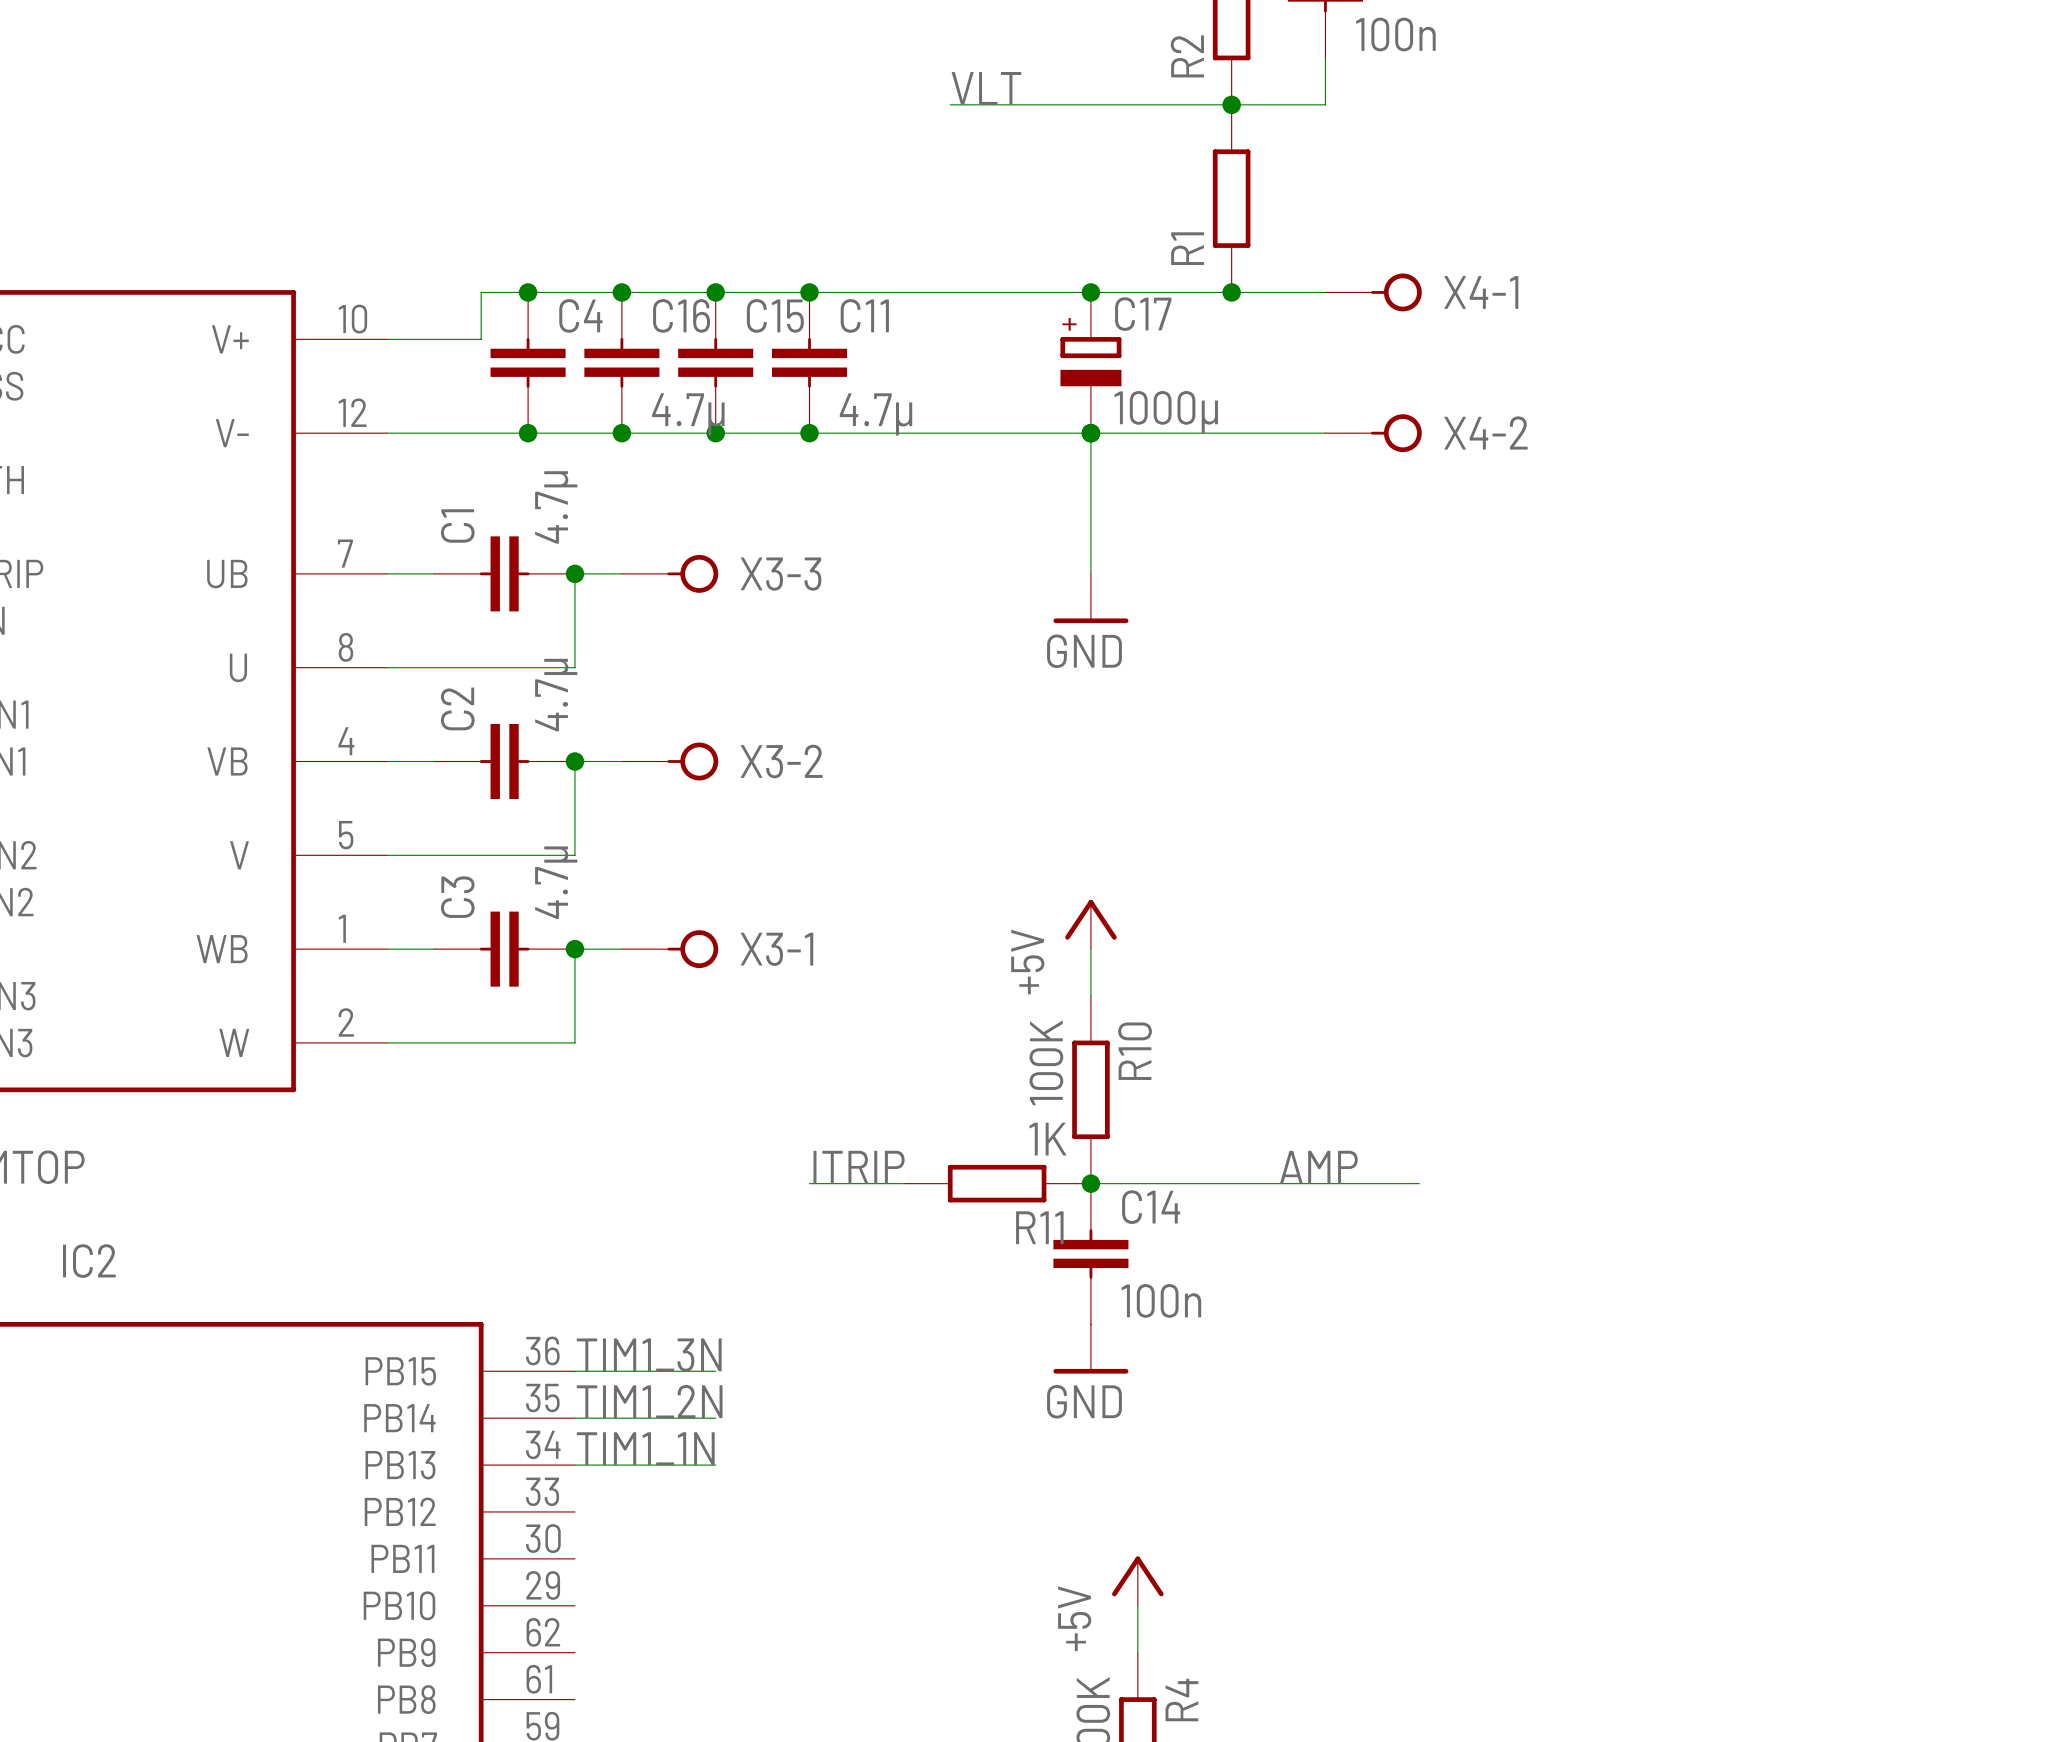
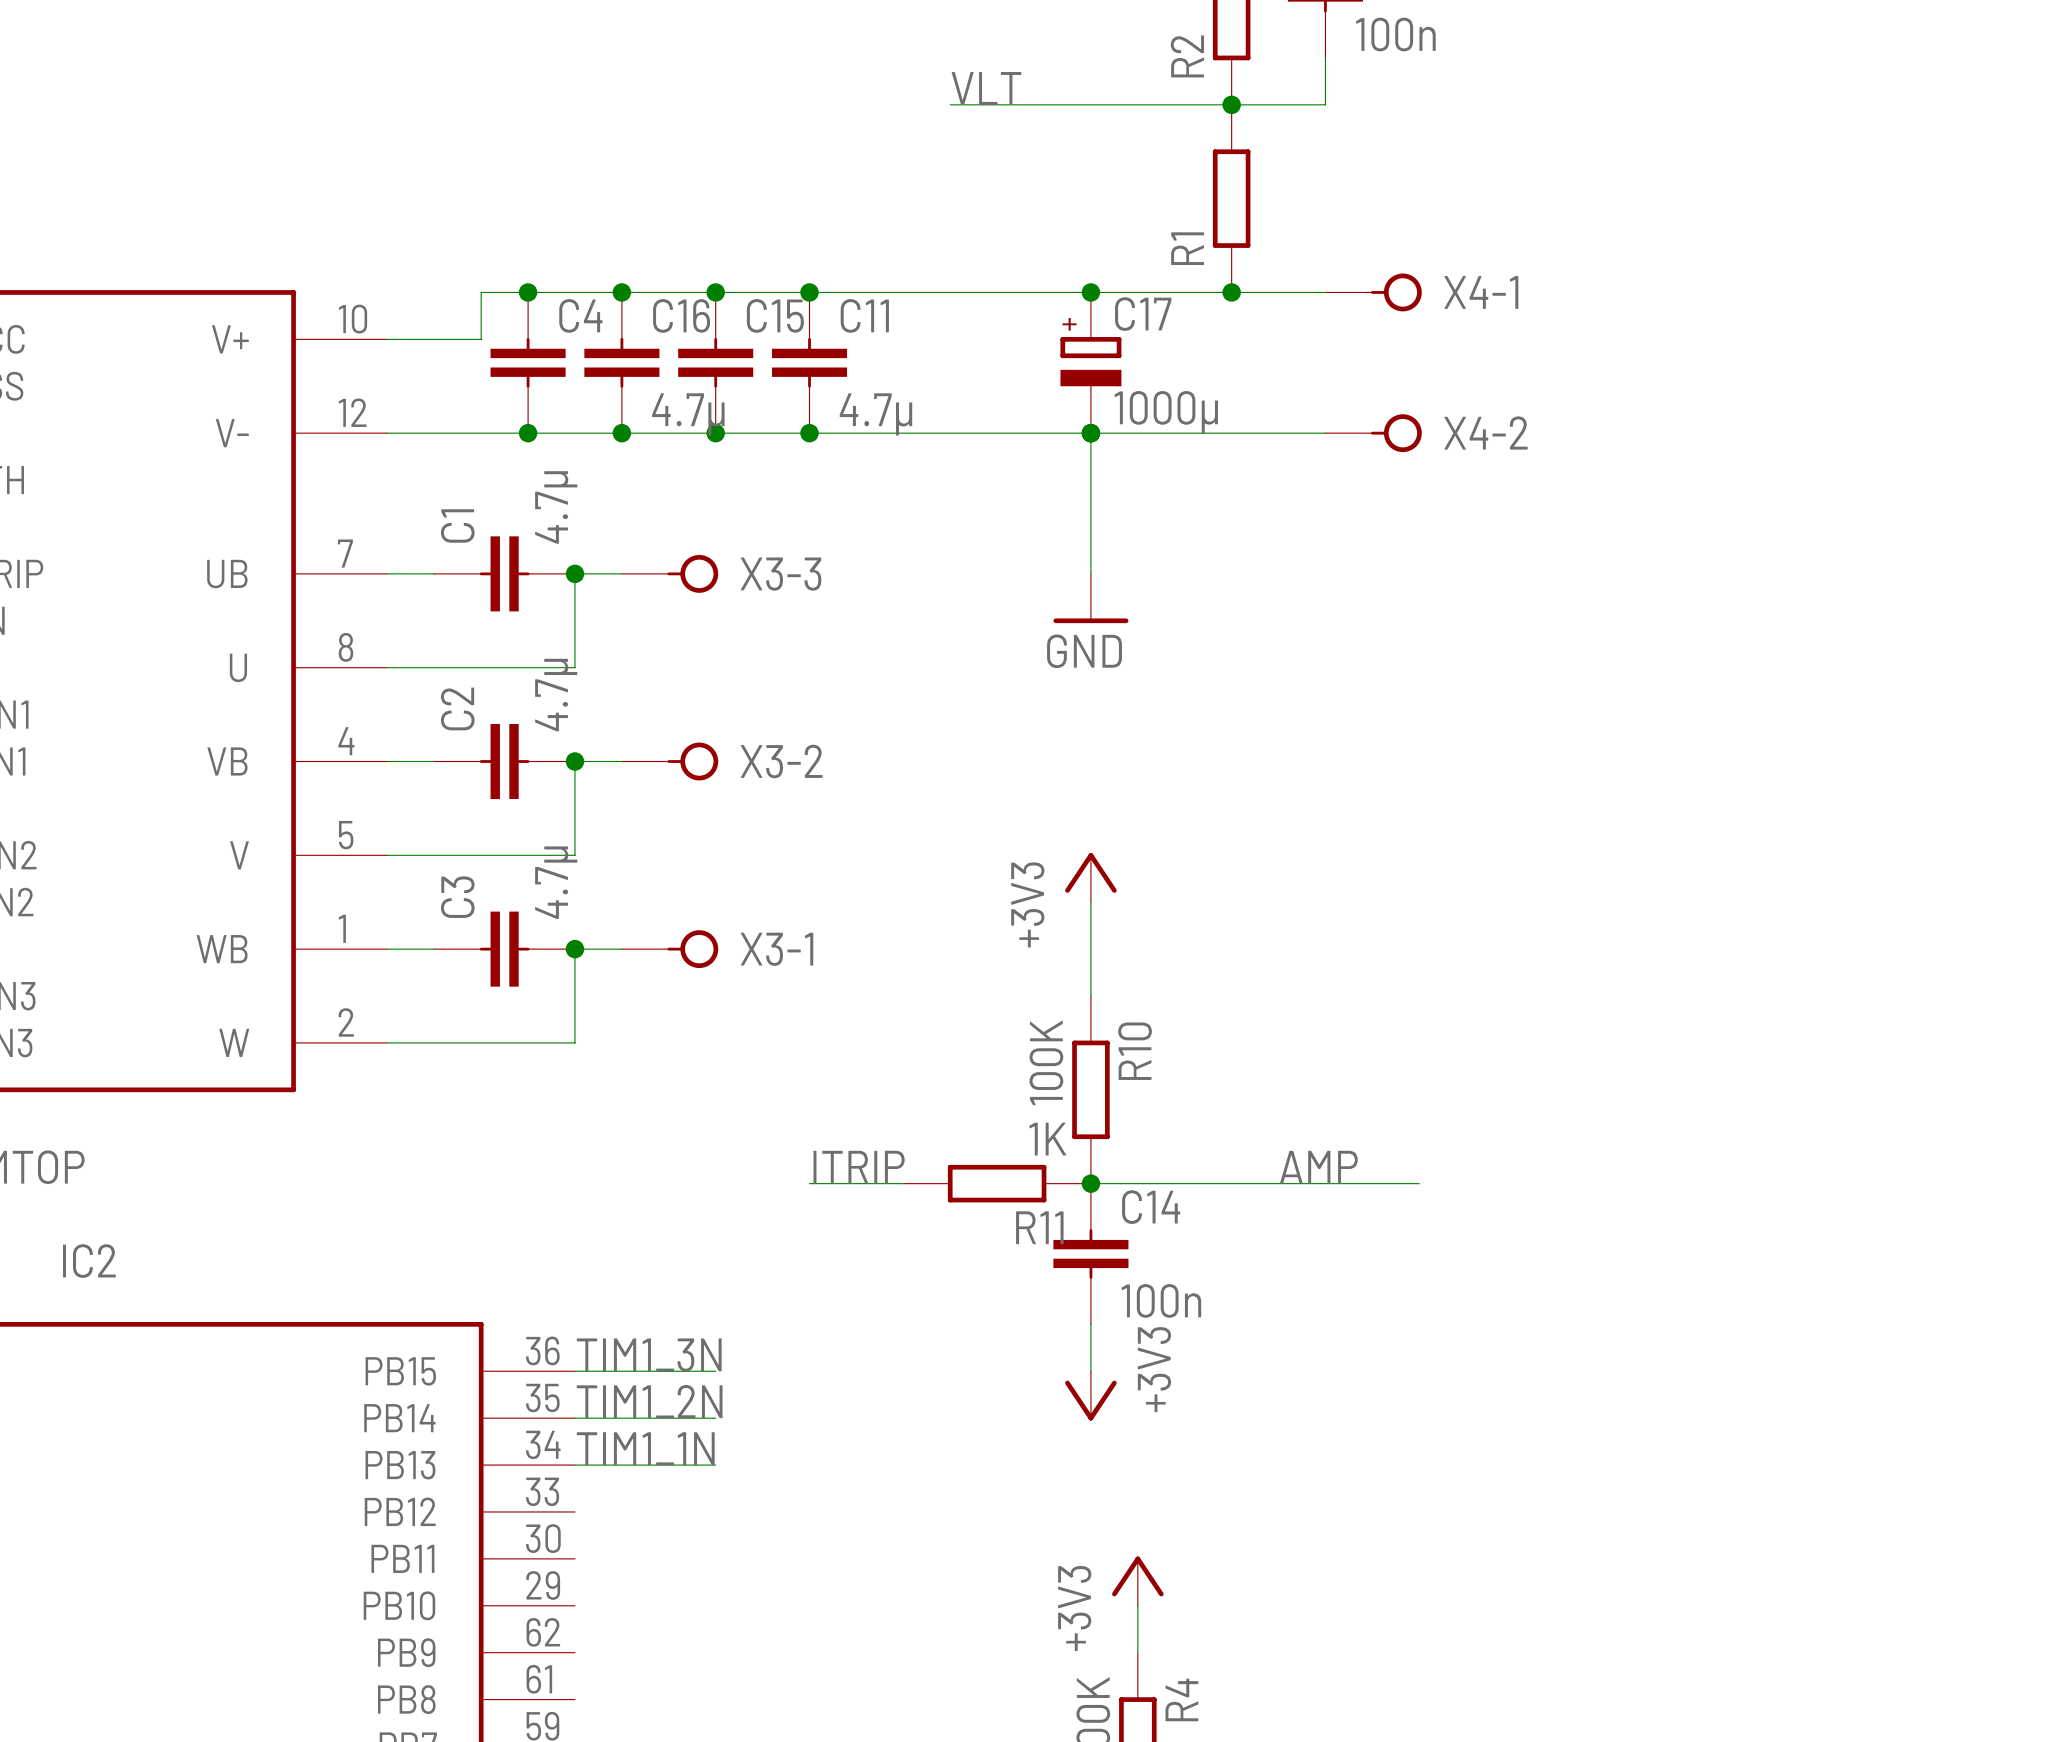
power symbol: none -> +3V3 (1090, 877)
power symbol: +5V (1090, 924) -> none
power symbol: GND (1090, 1348) -> none
power symbol: none -> +3V3 (1090, 1395)
power symbol: +5V (1137, 1581) -> +3V3 (1137, 1581)

